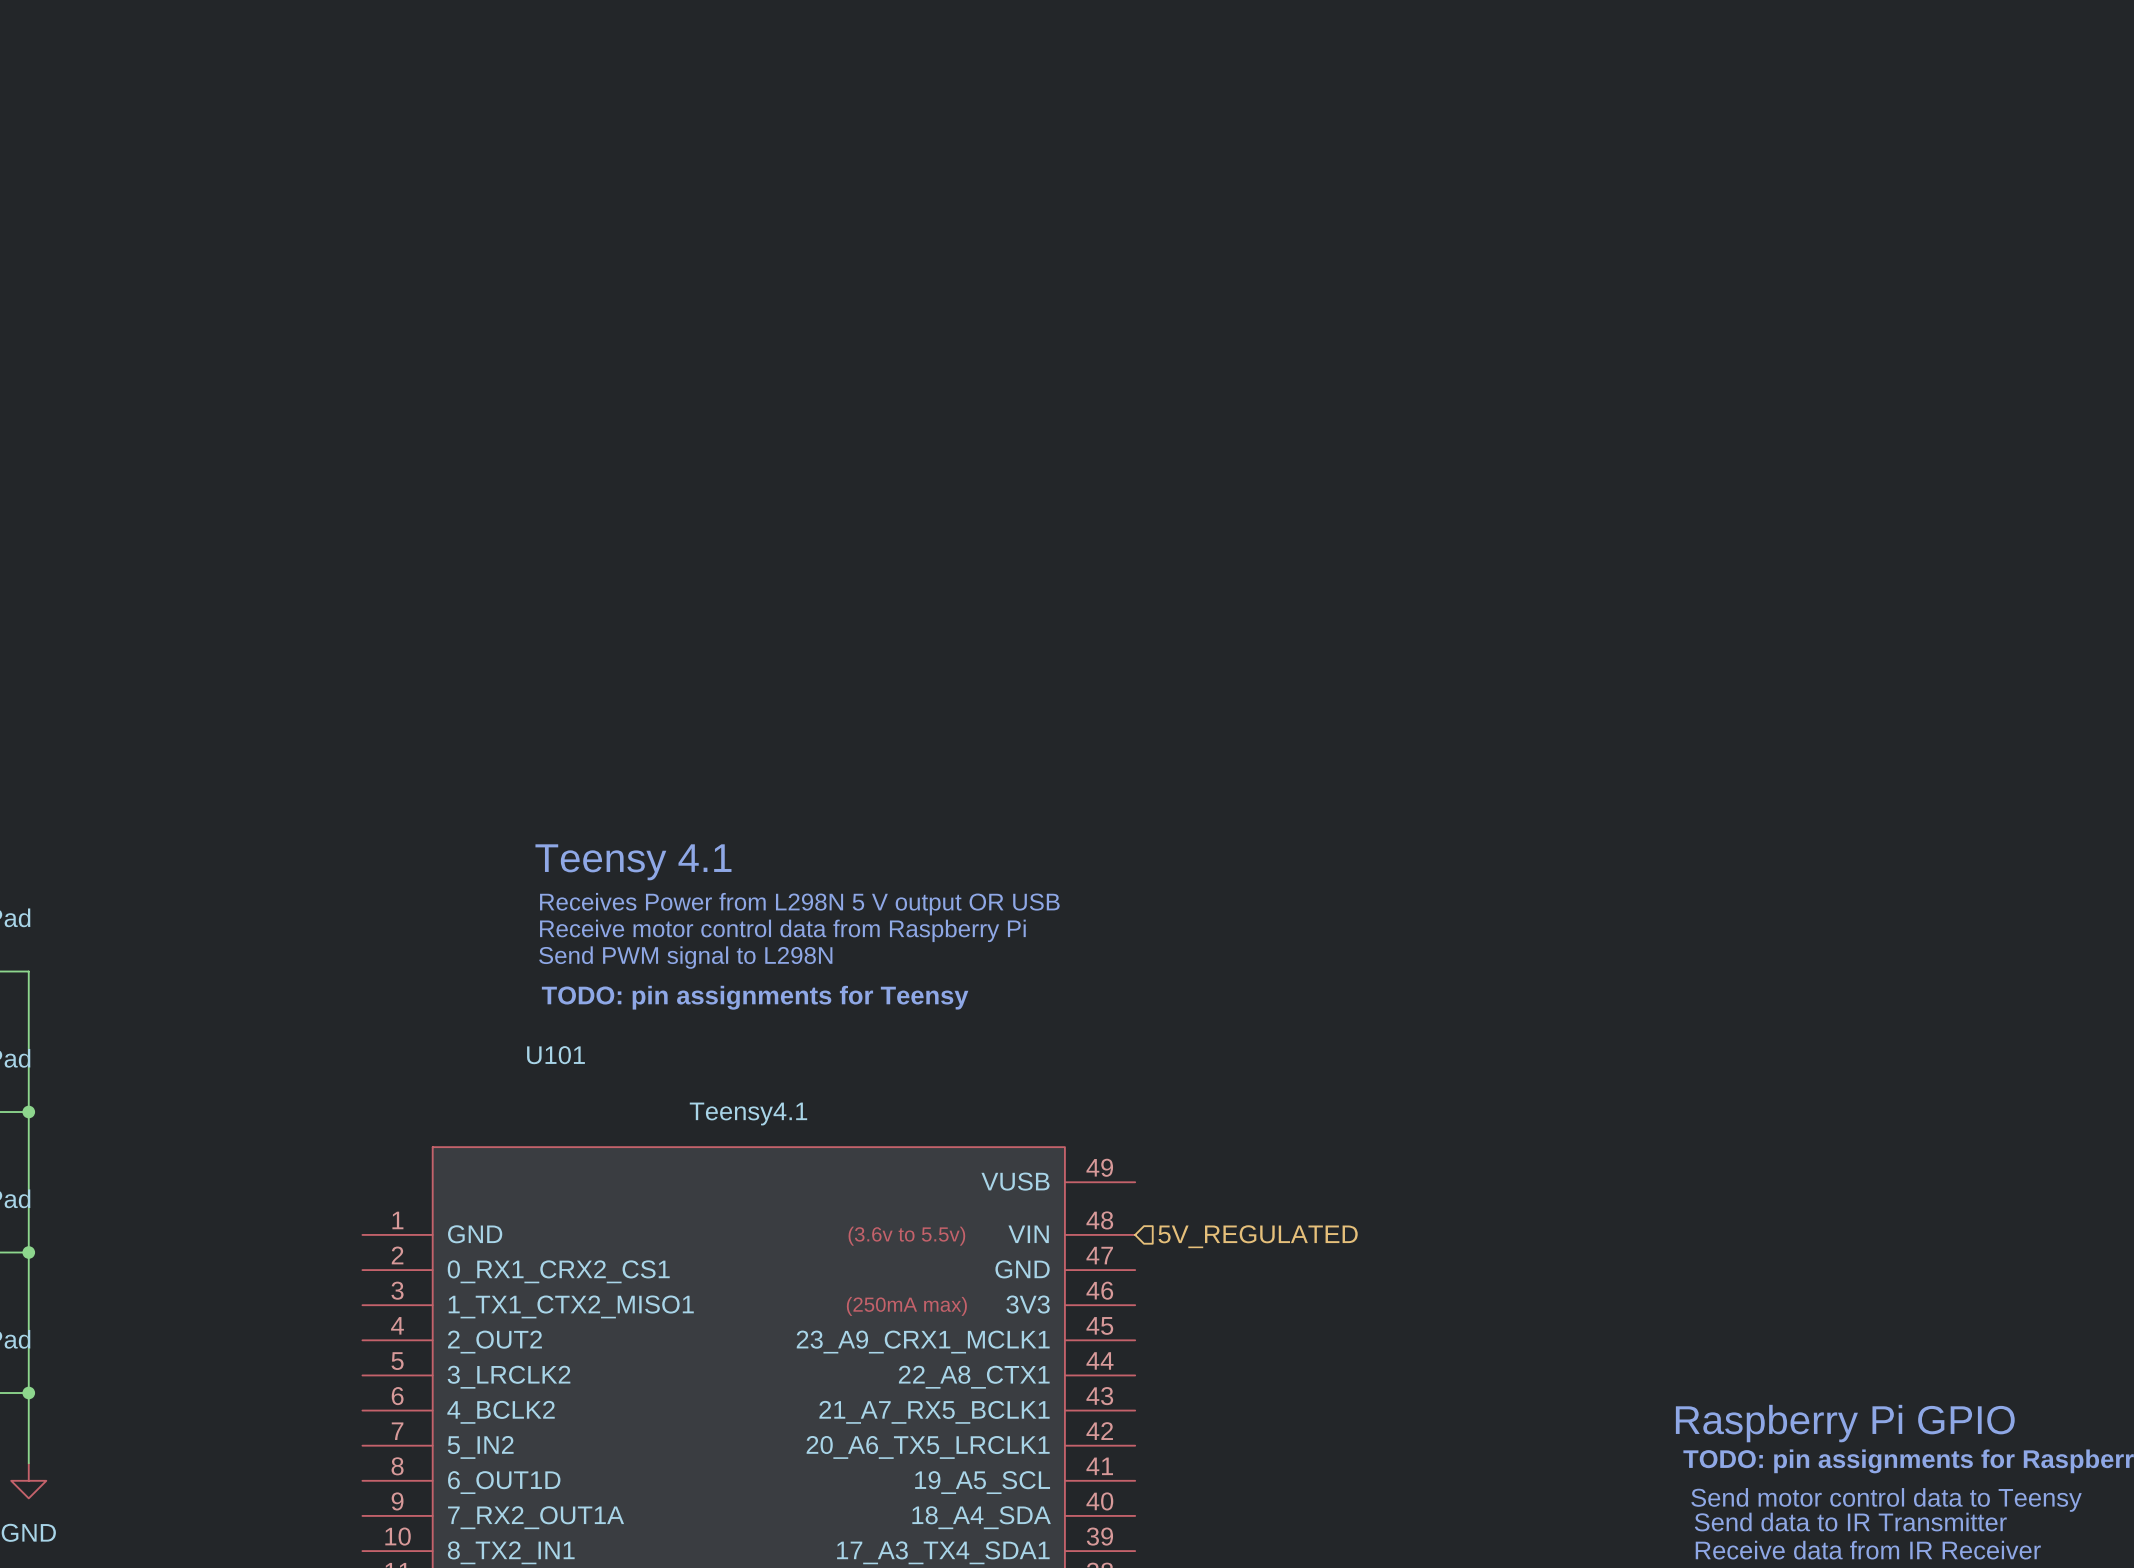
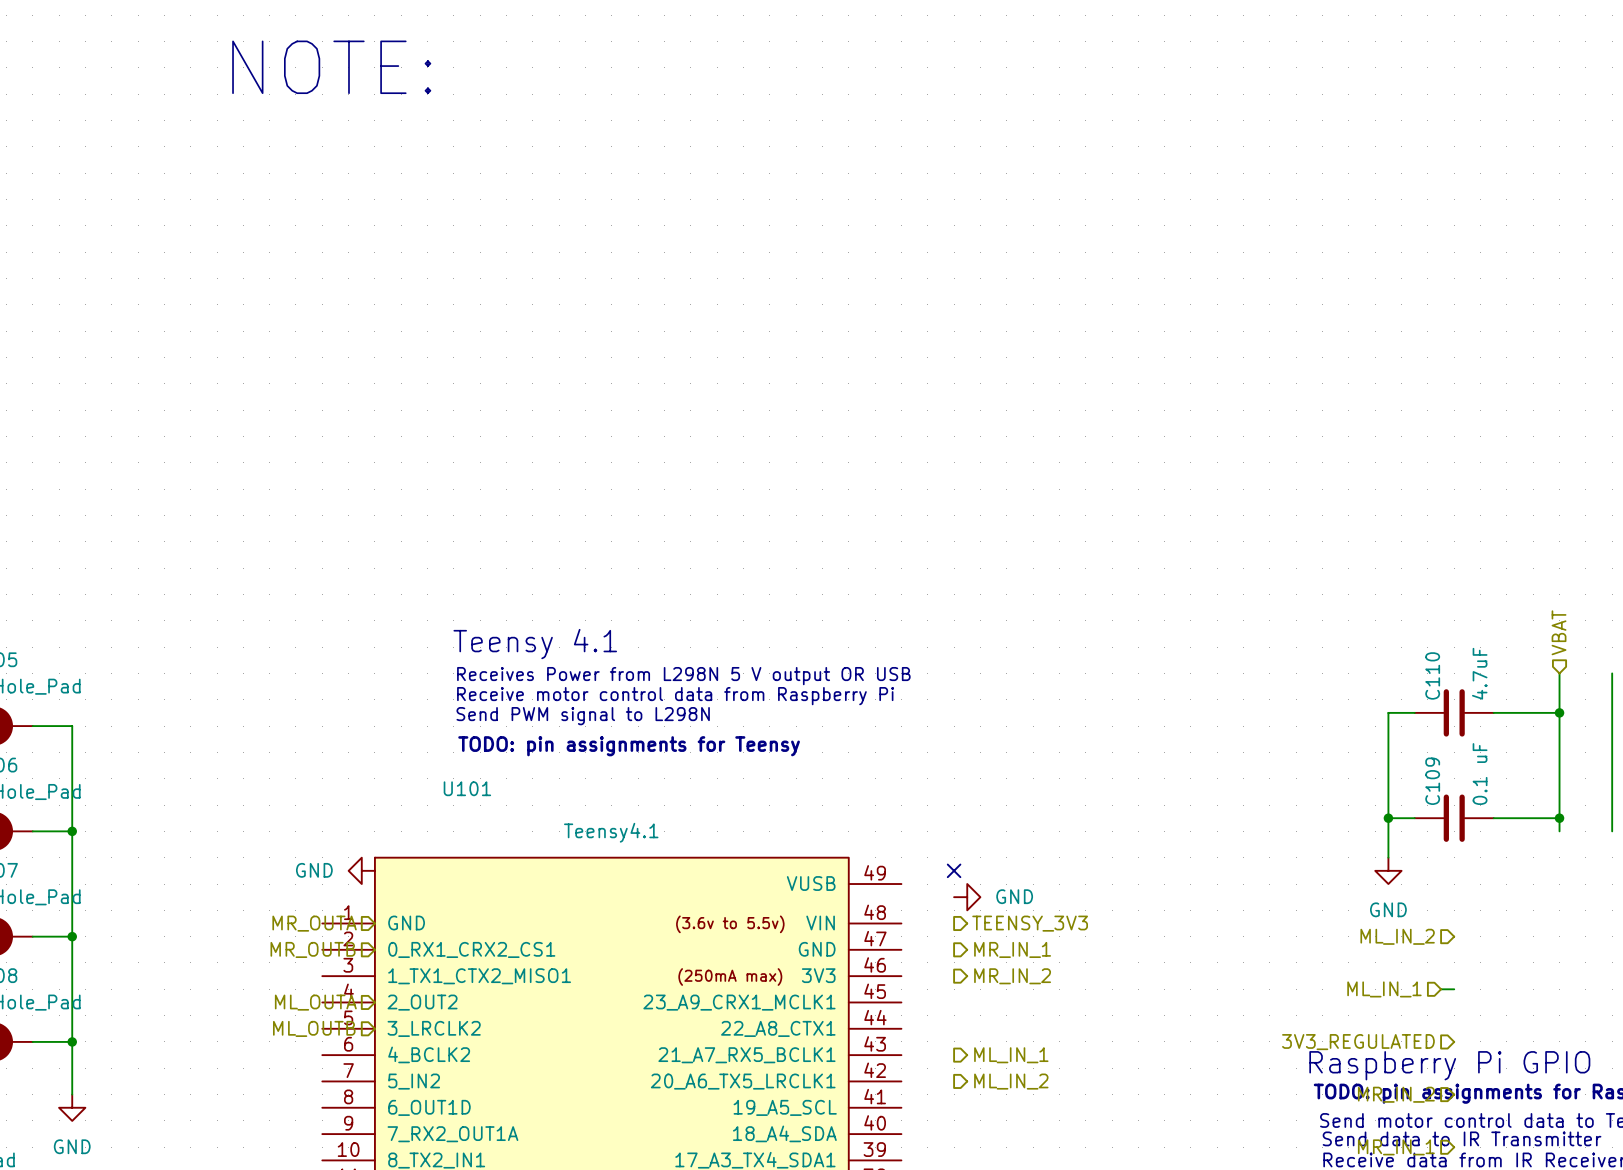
text: none -> NOTE: (331, 67)
hierarchical label: none -> VBAT (1559, 632)
wire: none -> (1559, 673) (1559, 831)
wire: none -> (1612, 673) (1612, 831)
wire: none -> (1414, 712) (1388, 712) (1388, 857)
C110: none -> 4.7uF (1454, 712)
wire: none -> (1493, 712) (1559, 712)
junction: none -> (1559, 712)
wire: none -> (1388, 818) (1414, 818)
junction: none -> (1388, 818)
C109: none -> 0.1 uF (1454, 818)
wire: none -> (1493, 818) (1559, 818)
junction: none -> (1559, 818)
power symbol: none -> GND (361, 870)
no-connect mark: none -> (954, 870)
power symbol: none -> GND (1388, 870)
power symbol: none -> GND (967, 897)
hierarchical label: none -> MR_OUTA (314, 923)
hierarchical label: 5V_REGULATED (1258, 1236) -> none
hierarchical label: none -> TEENSY_3V3 (1030, 923)
hierarchical label: none -> ML_IN_2 (1397, 936)
hierarchical label: none -> MR_OUTB (313, 949)
hierarchical label: none -> MR_IN_1 (1012, 949)
hierarchical label: none -> MR_IN_2 (1012, 976)
wire: none -> (1441, 989) (1454, 989)
hierarchical label: none -> ML_IN_1 (1384, 989)
hierarchical label: none -> ML_OUTA (315, 1002)
hierarchical label: none -> ML_OUTB (314, 1028)
hierarchical label: none -> 3V3_REGULATED (1358, 1042)
hierarchical label: none -> ML_IN_1 (1011, 1055)
hierarchical label: none -> ML_IN_2 (1011, 1081)
hierarchical label: none -> MR_IN_2 (1396, 1094)
hierarchical label: none -> MR_IN_1 (1396, 1147)

